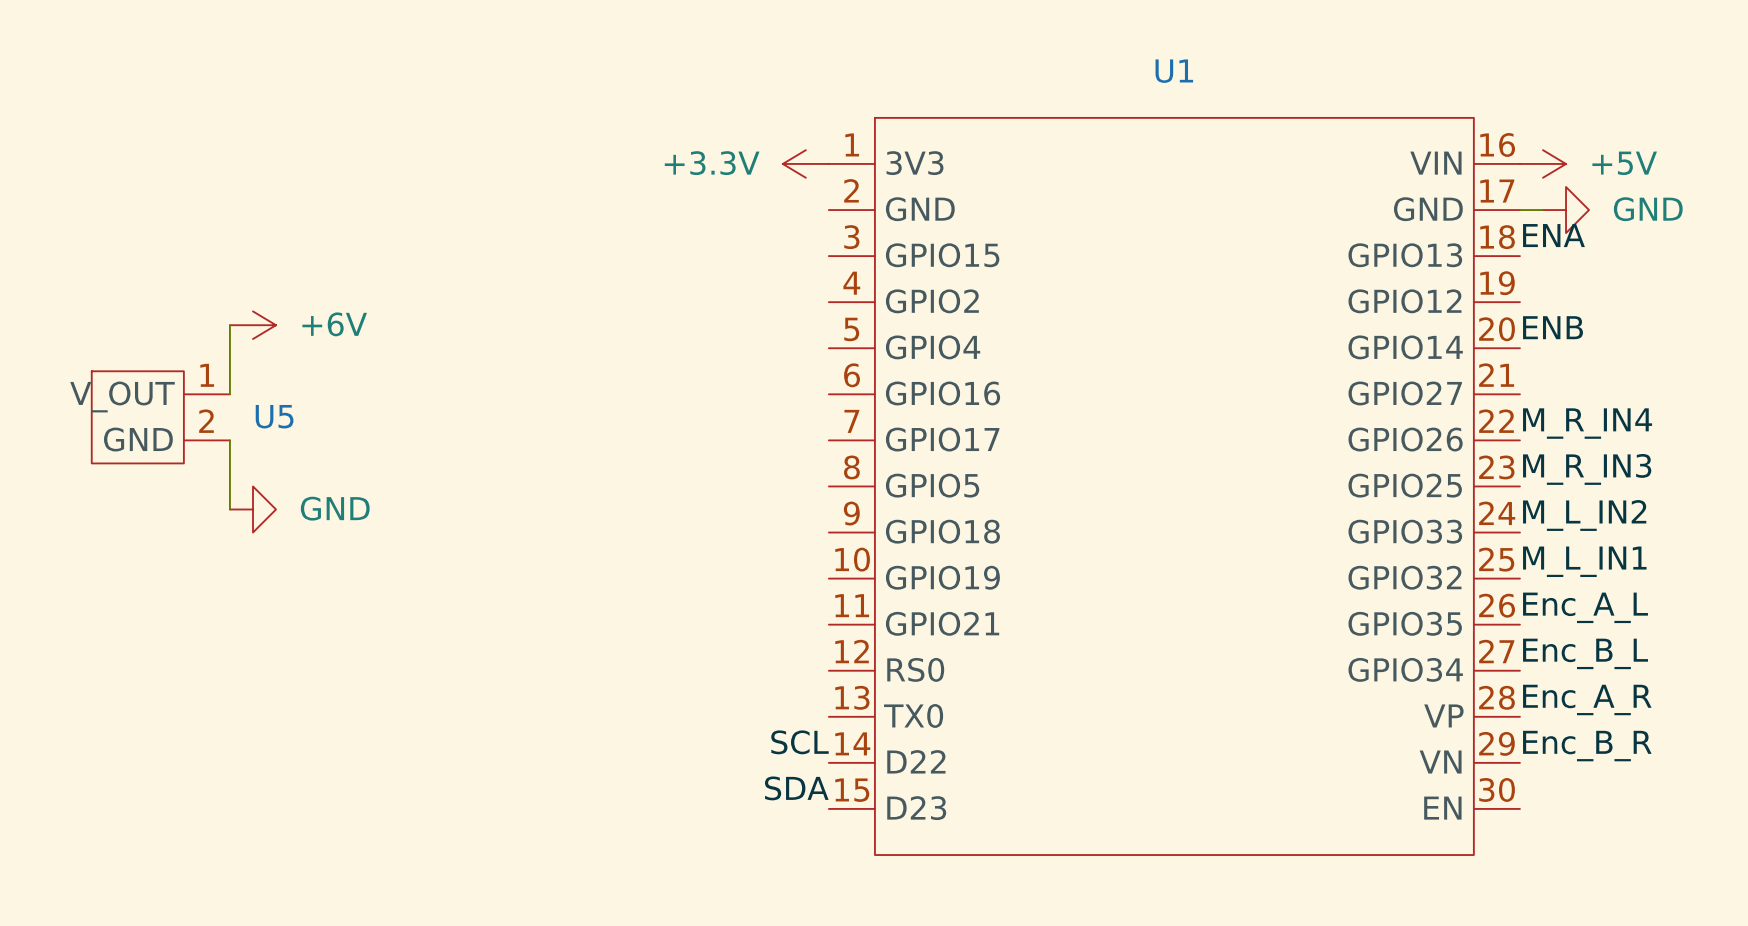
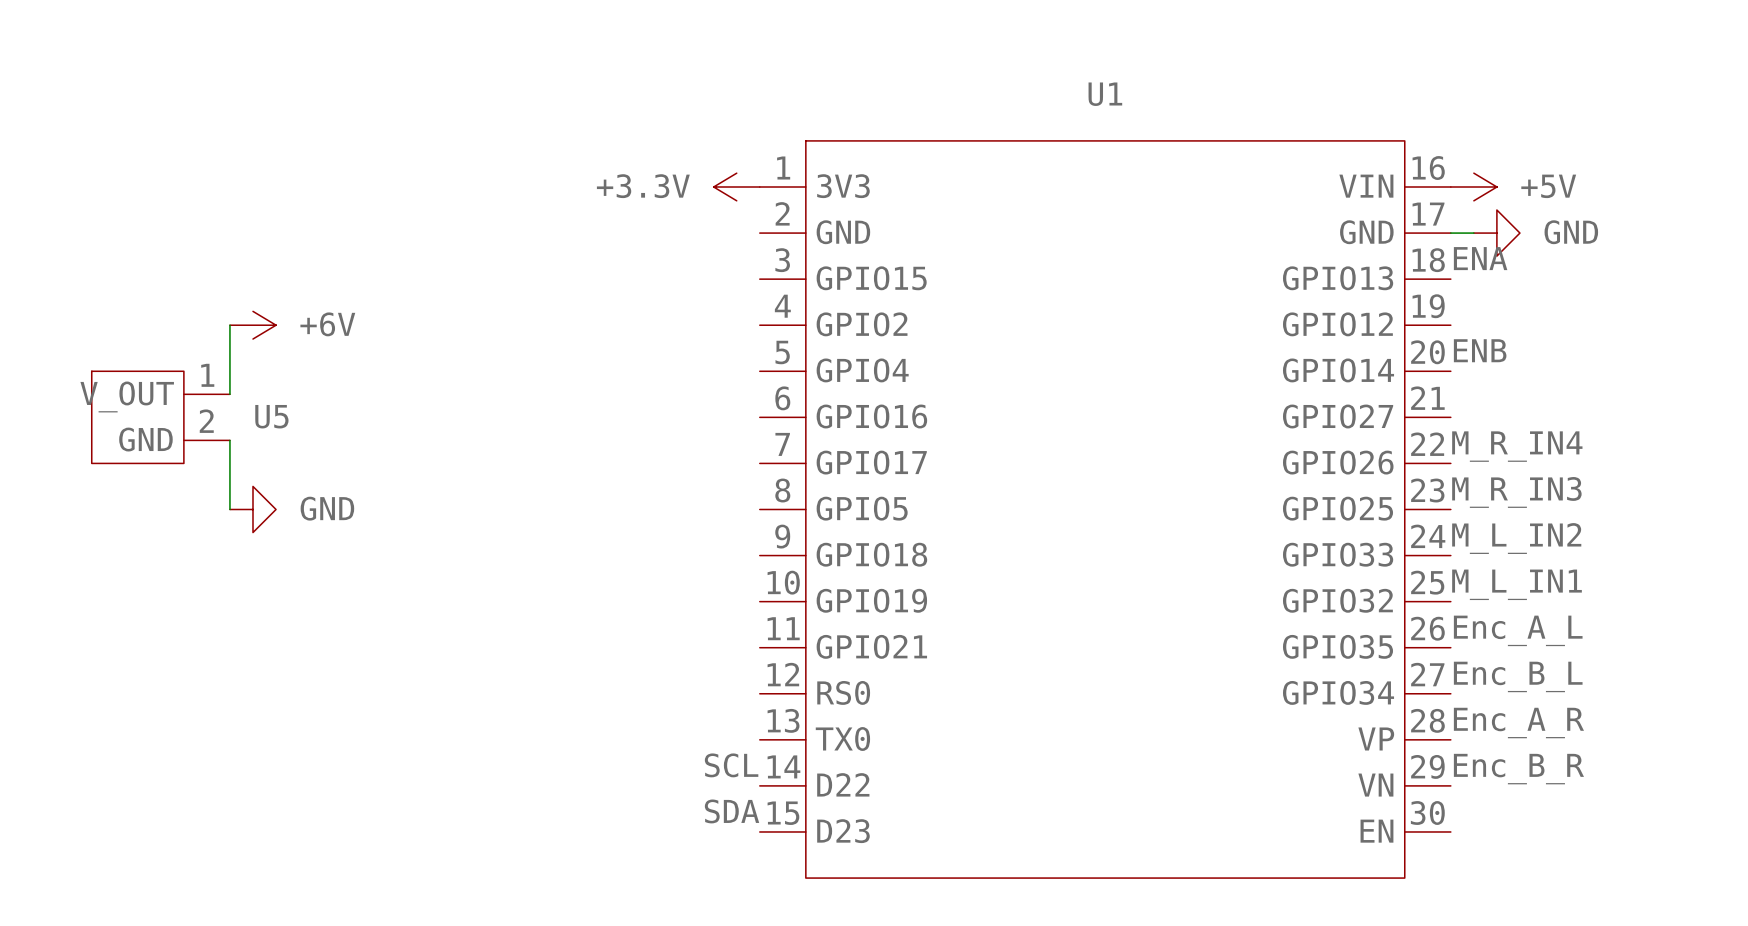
power symbol position: +3.3V (805, 163) -> +3.3V (736, 187)
power symbol position: +5V (1542, 163) -> +5V (1473, 187)
wire: (1519, 210) (1542, 210) -> (1450, 233) (1473, 233)
power symbol position: GND (1566, 210) -> GND (1496, 233)
label position: ENA (1553, 235) -> ENA (1480, 258)
label position: ENB (1553, 327) -> ENB (1480, 350)
label position: M_R_IN4 (1587, 423) -> M_R_IN4 (1517, 446)
label position: M_R_IN3 (1587, 469) -> M_R_IN3 (1516, 492)
U1 position: (1174, 486) -> (1105, 509)
label position: M_L_IN2 (1584, 515) -> M_L_IN2 (1516, 538)
label position: M_L_IN1 (1584, 561) -> M_L_IN1 (1517, 584)
label position: Enc_A_L (1585, 607) -> Enc_A_L (1518, 630)
label position: Enc_B_L (1585, 653) -> Enc_B_L (1518, 676)
label position: Enc_A_R (1587, 699) -> Enc_A_R (1518, 723)
label position: SCL (799, 742) -> SCL (731, 765)
label position: Enc_B_R (1587, 746) -> Enc_B_R (1518, 769)
label position: SDA (796, 788) -> SDA (732, 811)

